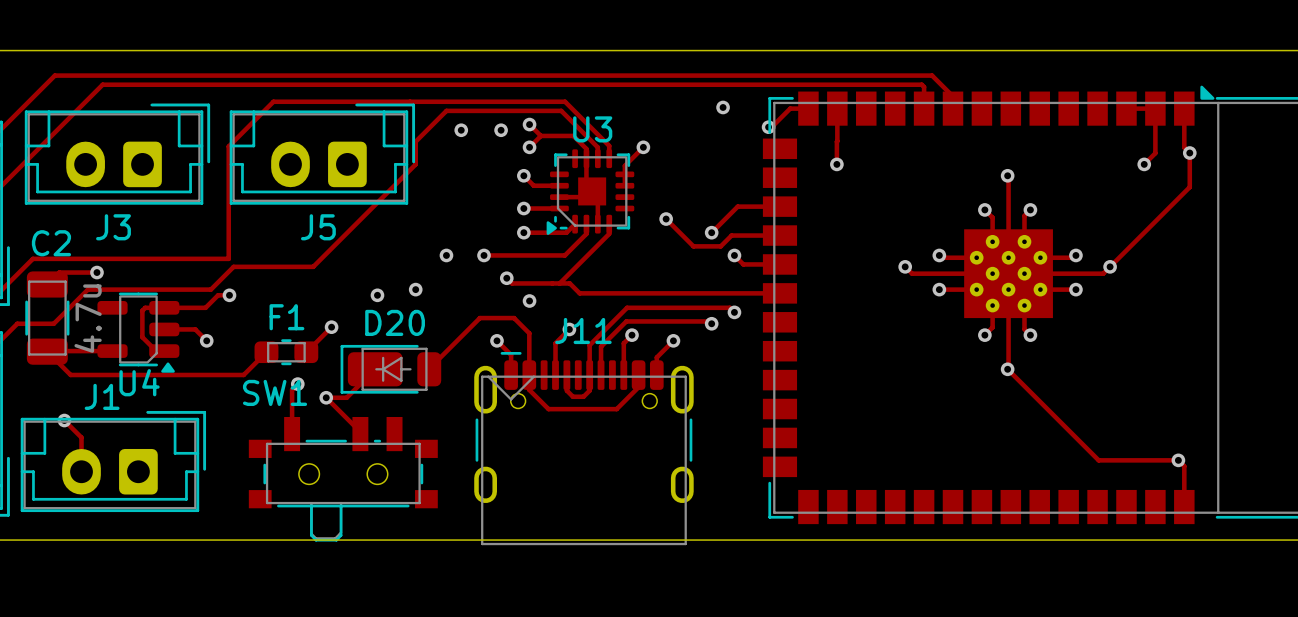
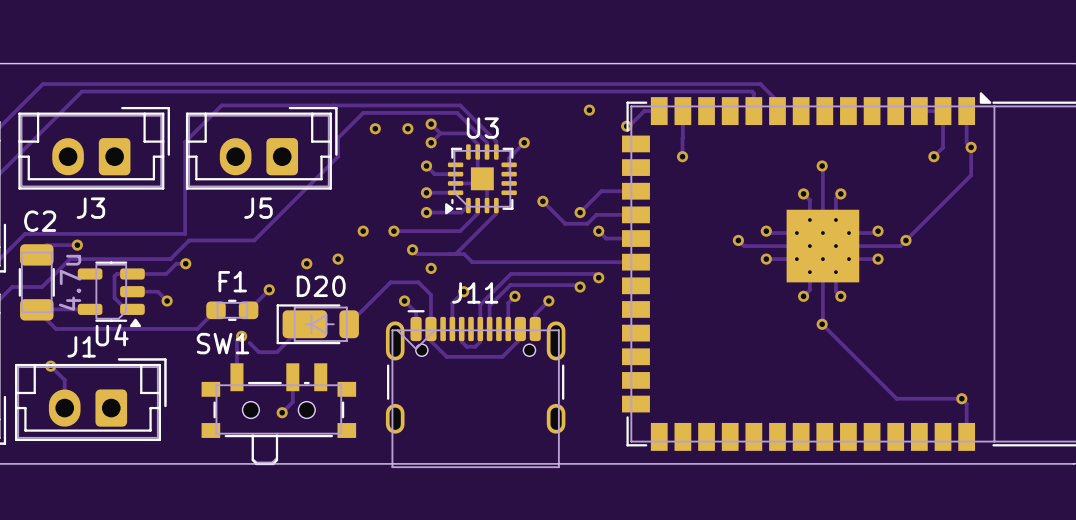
via position: (326, 397) -> (282, 412)
track: (346, 397) (326, 397) (360, 431) -> (281, 347) (276, 352) (258, 352) (249, 342)
track: none -> (292, 377) (292, 402) (282, 412)

